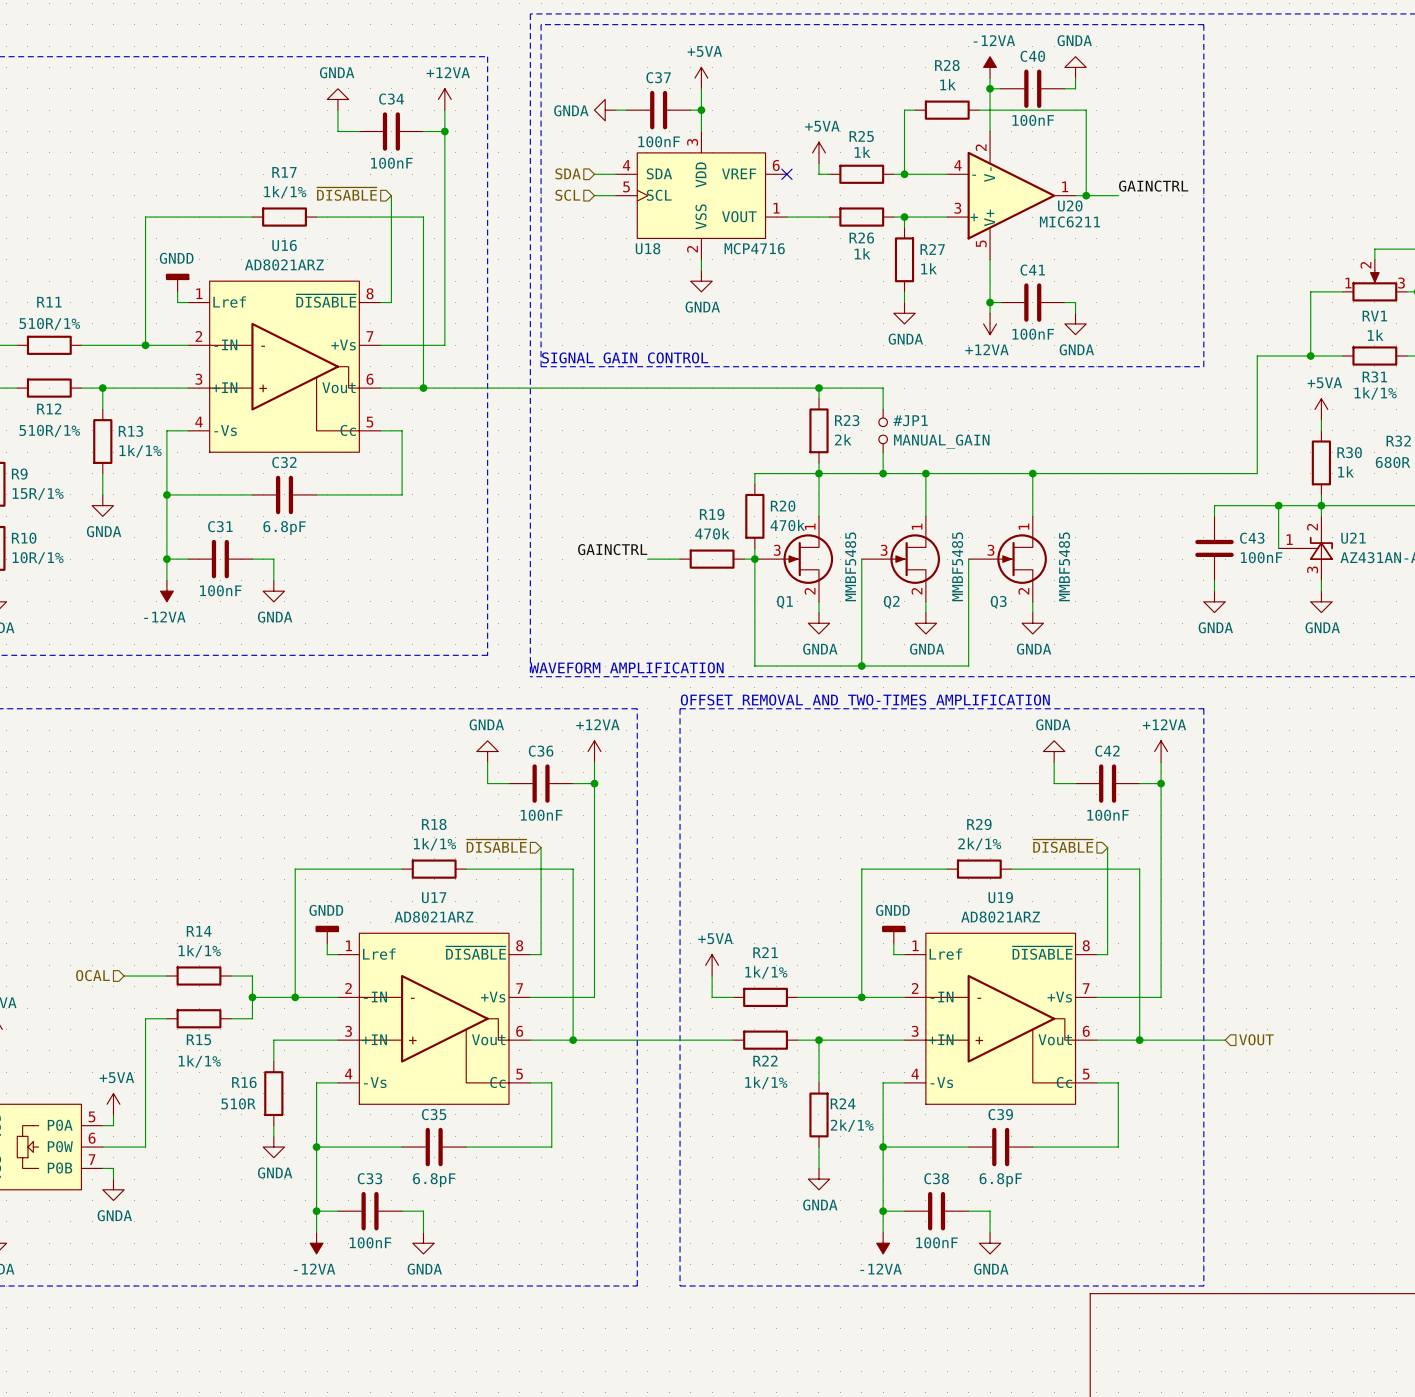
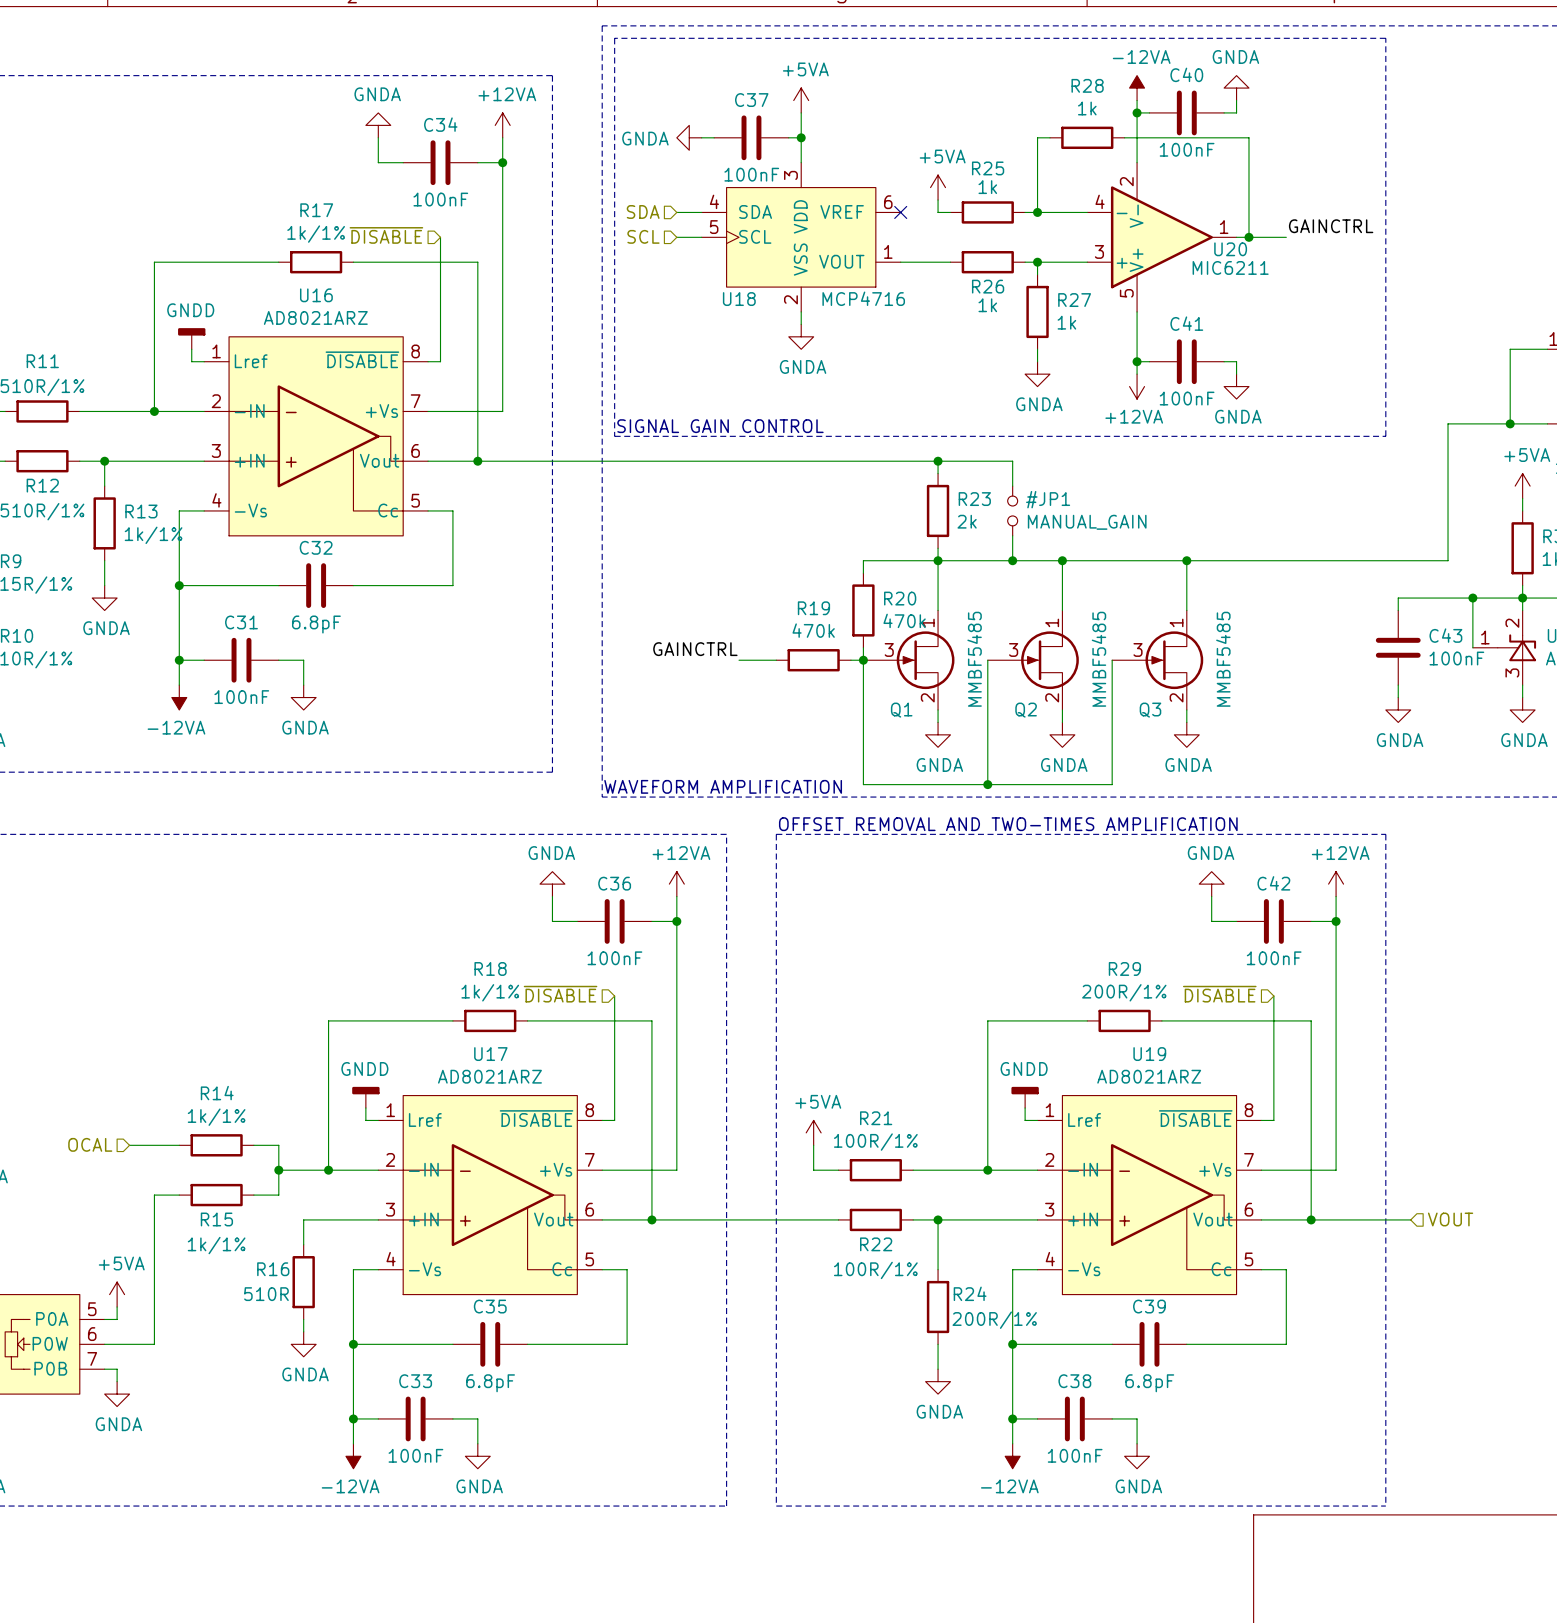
R29 value: 2k/1% (979, 844) -> 200R/1% (1124, 992)
R21 value: 1k/1% (766, 972) -> 100R/1% (875, 1142)
R22 value: 1k/1% (766, 1082) -> 100R/1% (875, 1270)
R24 value: 2k/1% (852, 1125) -> 200R/1% (994, 1320)

